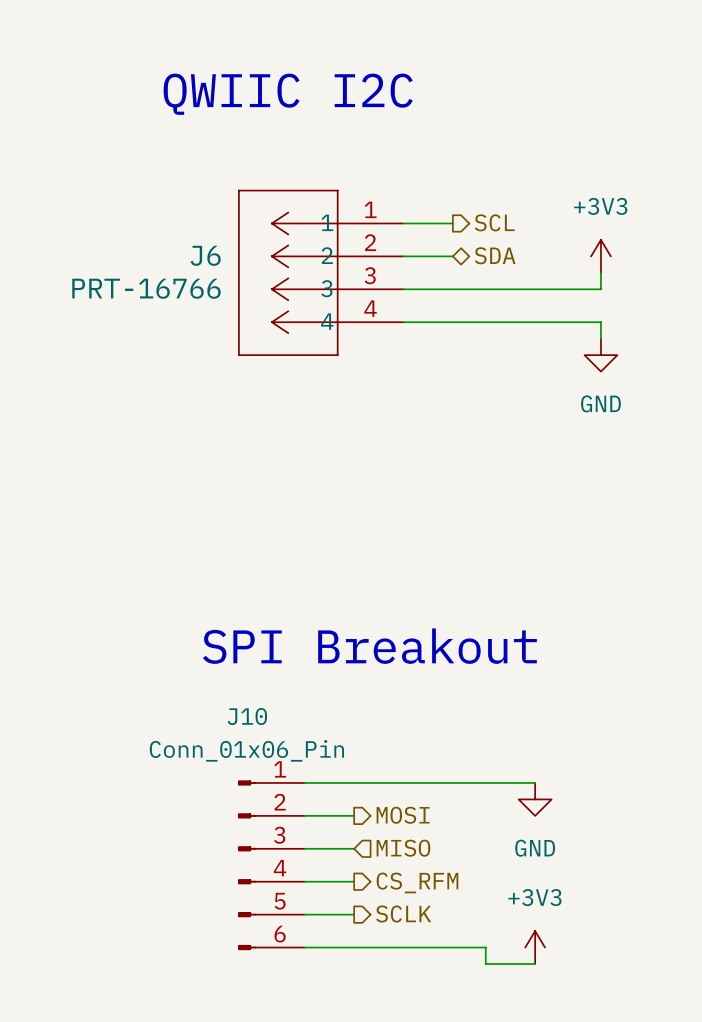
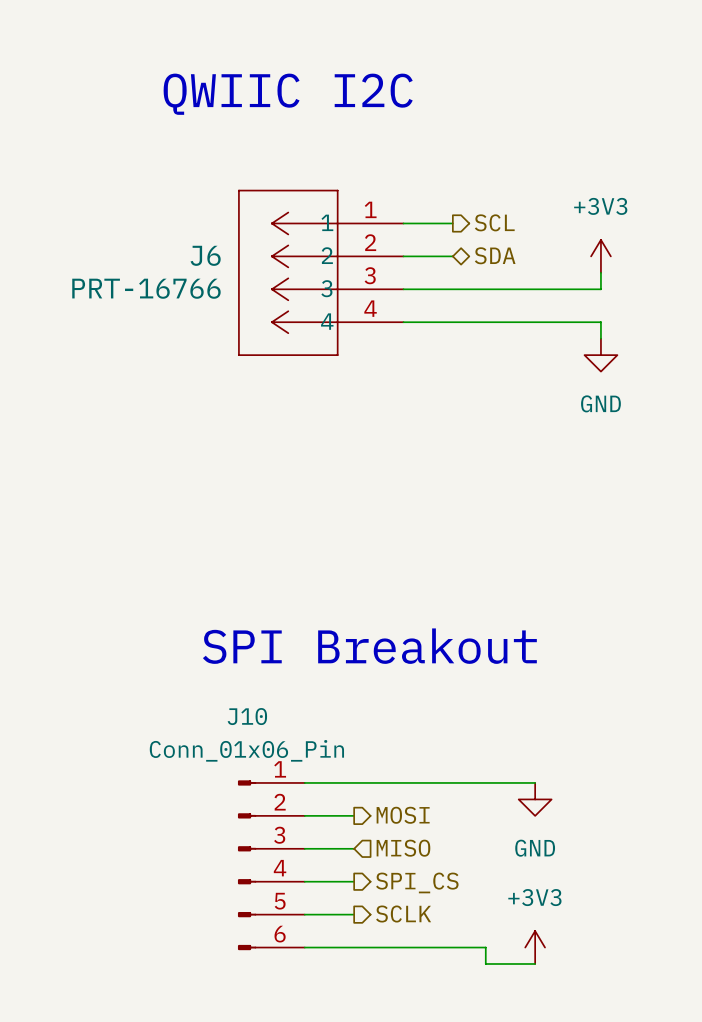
hierarchical label: CS_RFM (417, 882) -> SPI_CS (417, 882)

